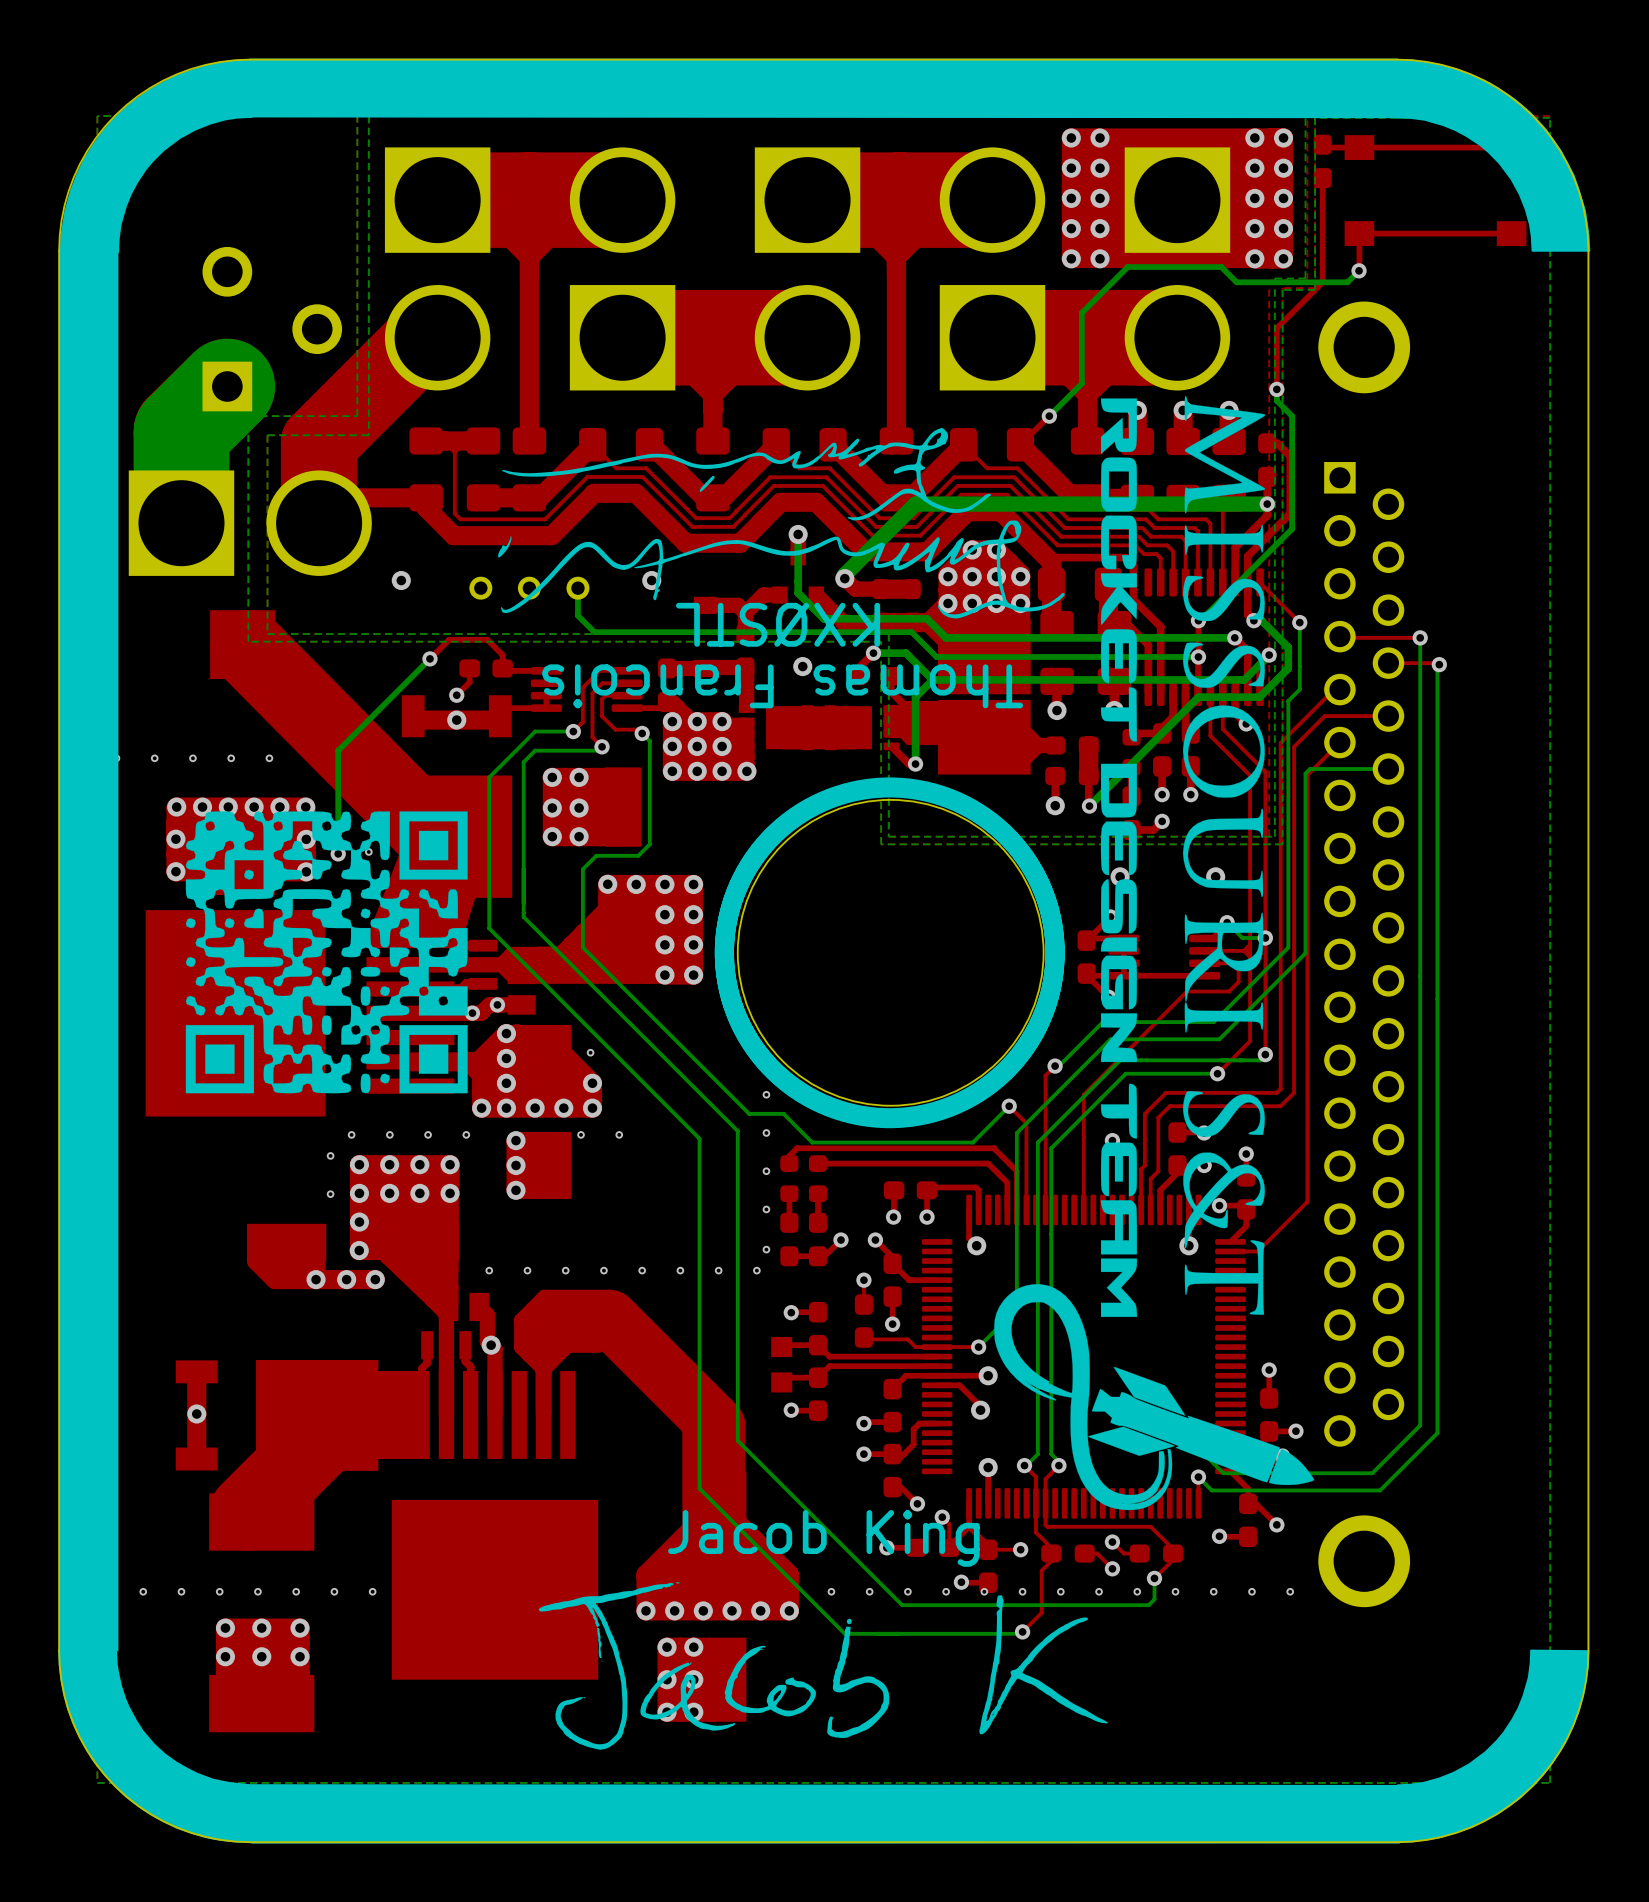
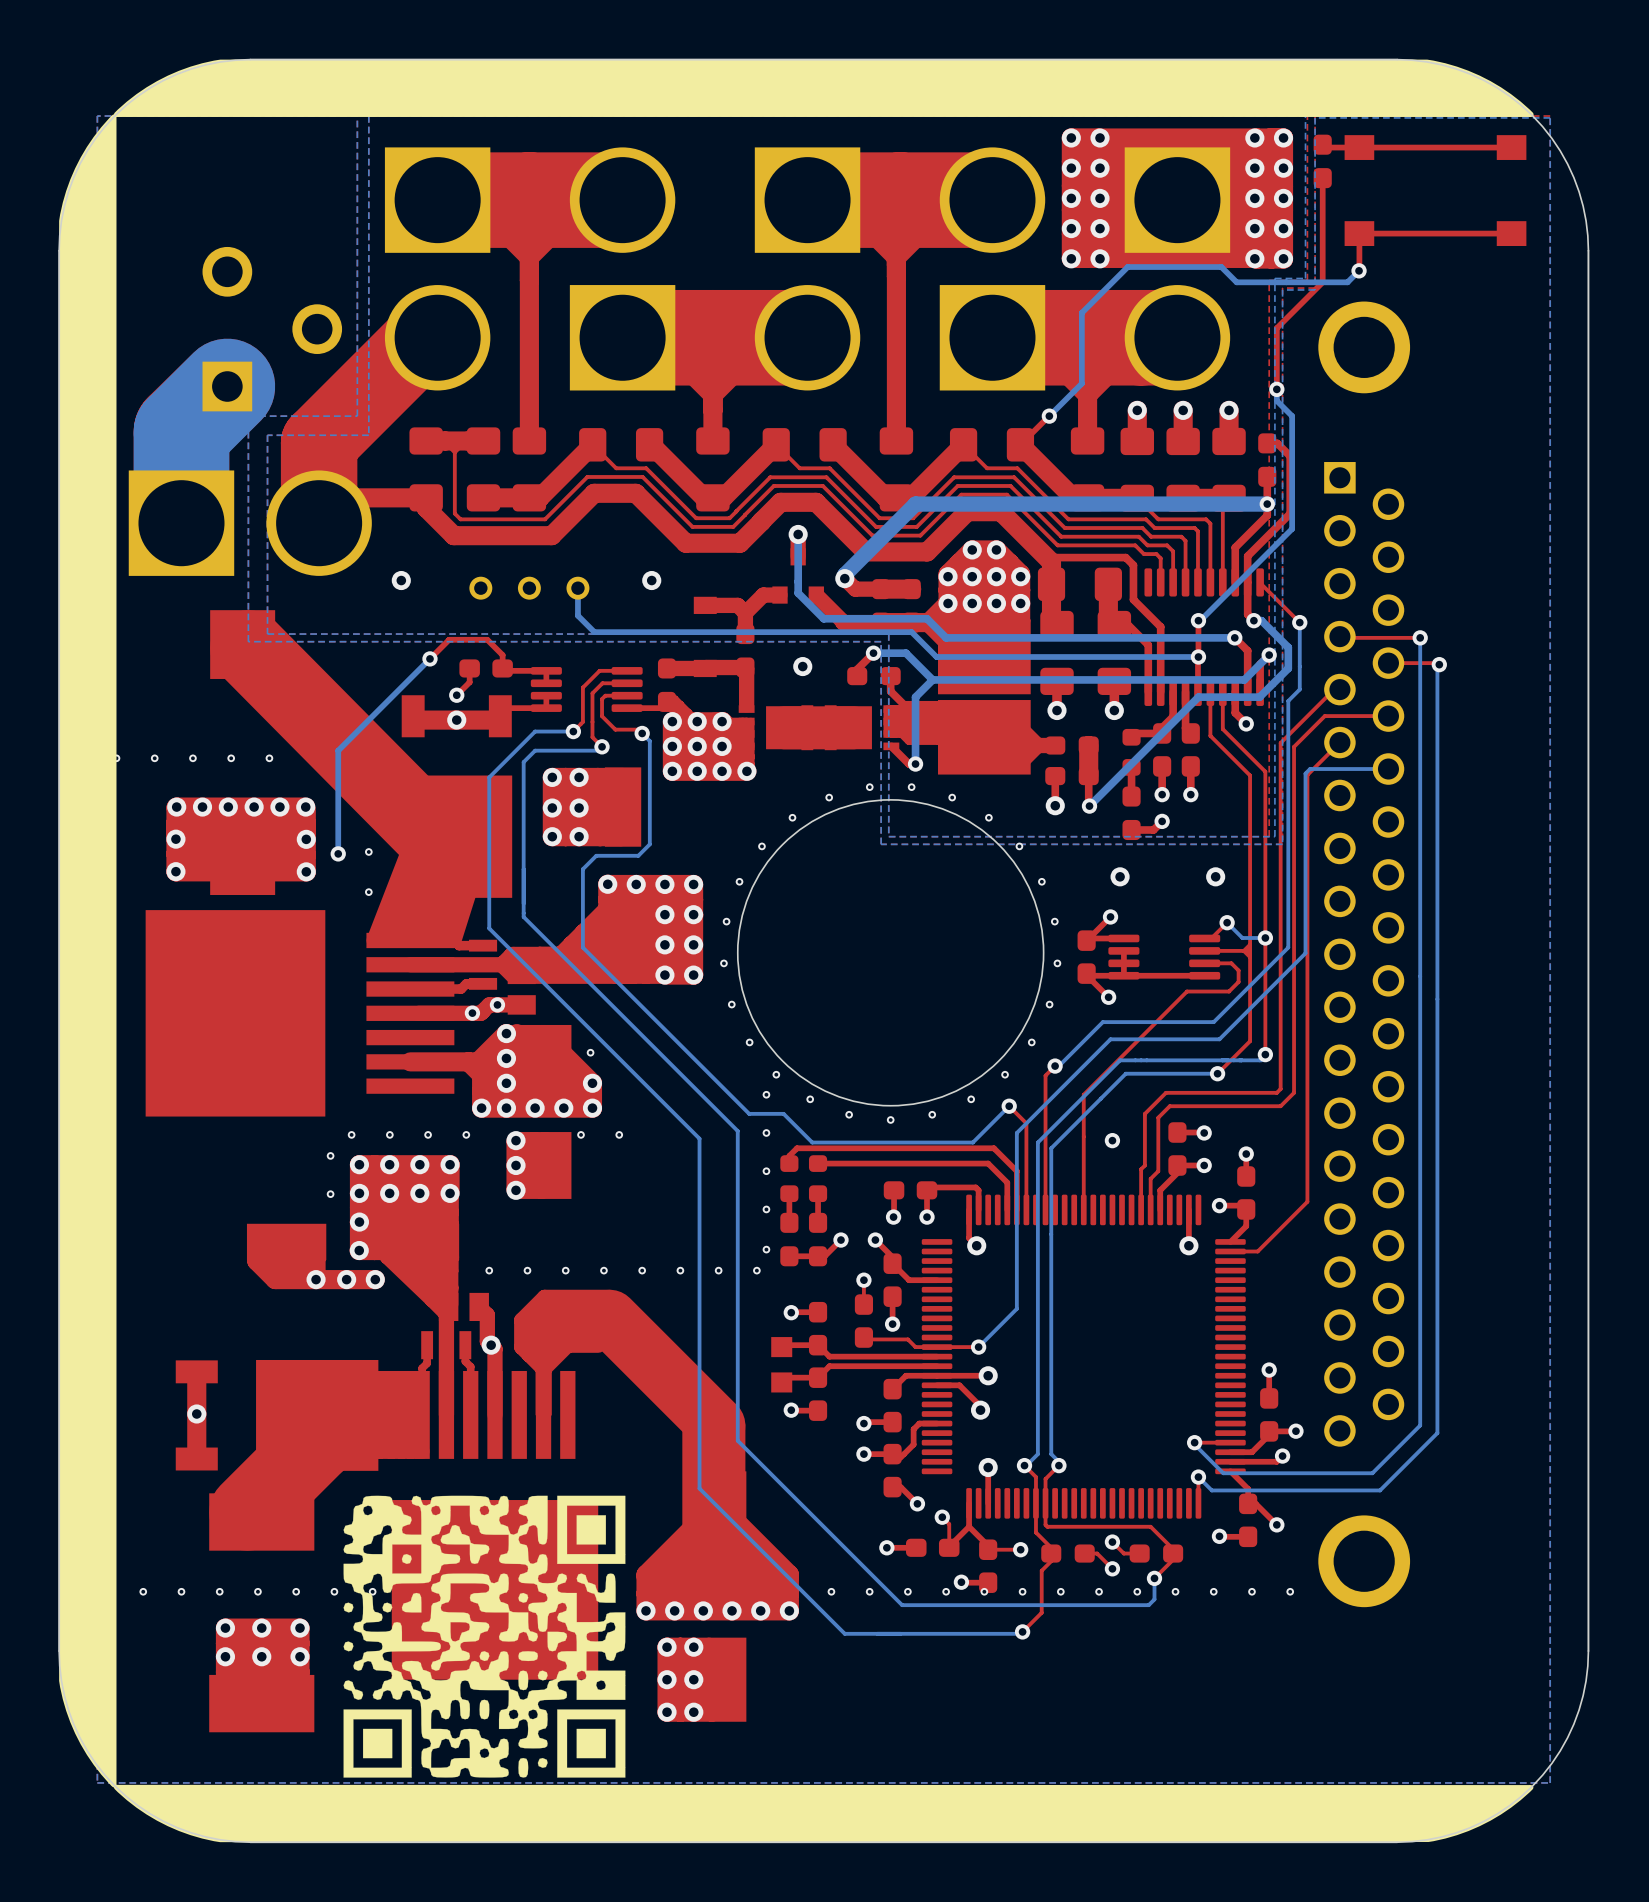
drawing shape: [248, 58, 1403, 119] -> [113, 59, 1534, 117]
drawing: [59, 59, 253, 253] -> none
drawing: [1396, 59, 1591, 252] -> none
drawing shape: [59, 250, 119, 1652] -> [59, 114, 117, 1788]
drawing: [497, 396, 1315, 1511] -> none
text: KXØSTL (778, 624) -> none
text: Thomas Francois (782, 686) -> none
drawing: [185, 811, 468, 1094] -> none
drawing: none -> [343, 1495, 626, 1778]
text: Jacob King (823, 1538) -> none
drawing: [538, 1582, 1108, 1750] -> none
drawing: [58, 1649, 252, 1844] -> none
drawing: [1396, 1649, 1590, 1844] -> none
drawing shape: [249, 1784, 1401, 1844] -> [113, 1784, 1534, 1843]

